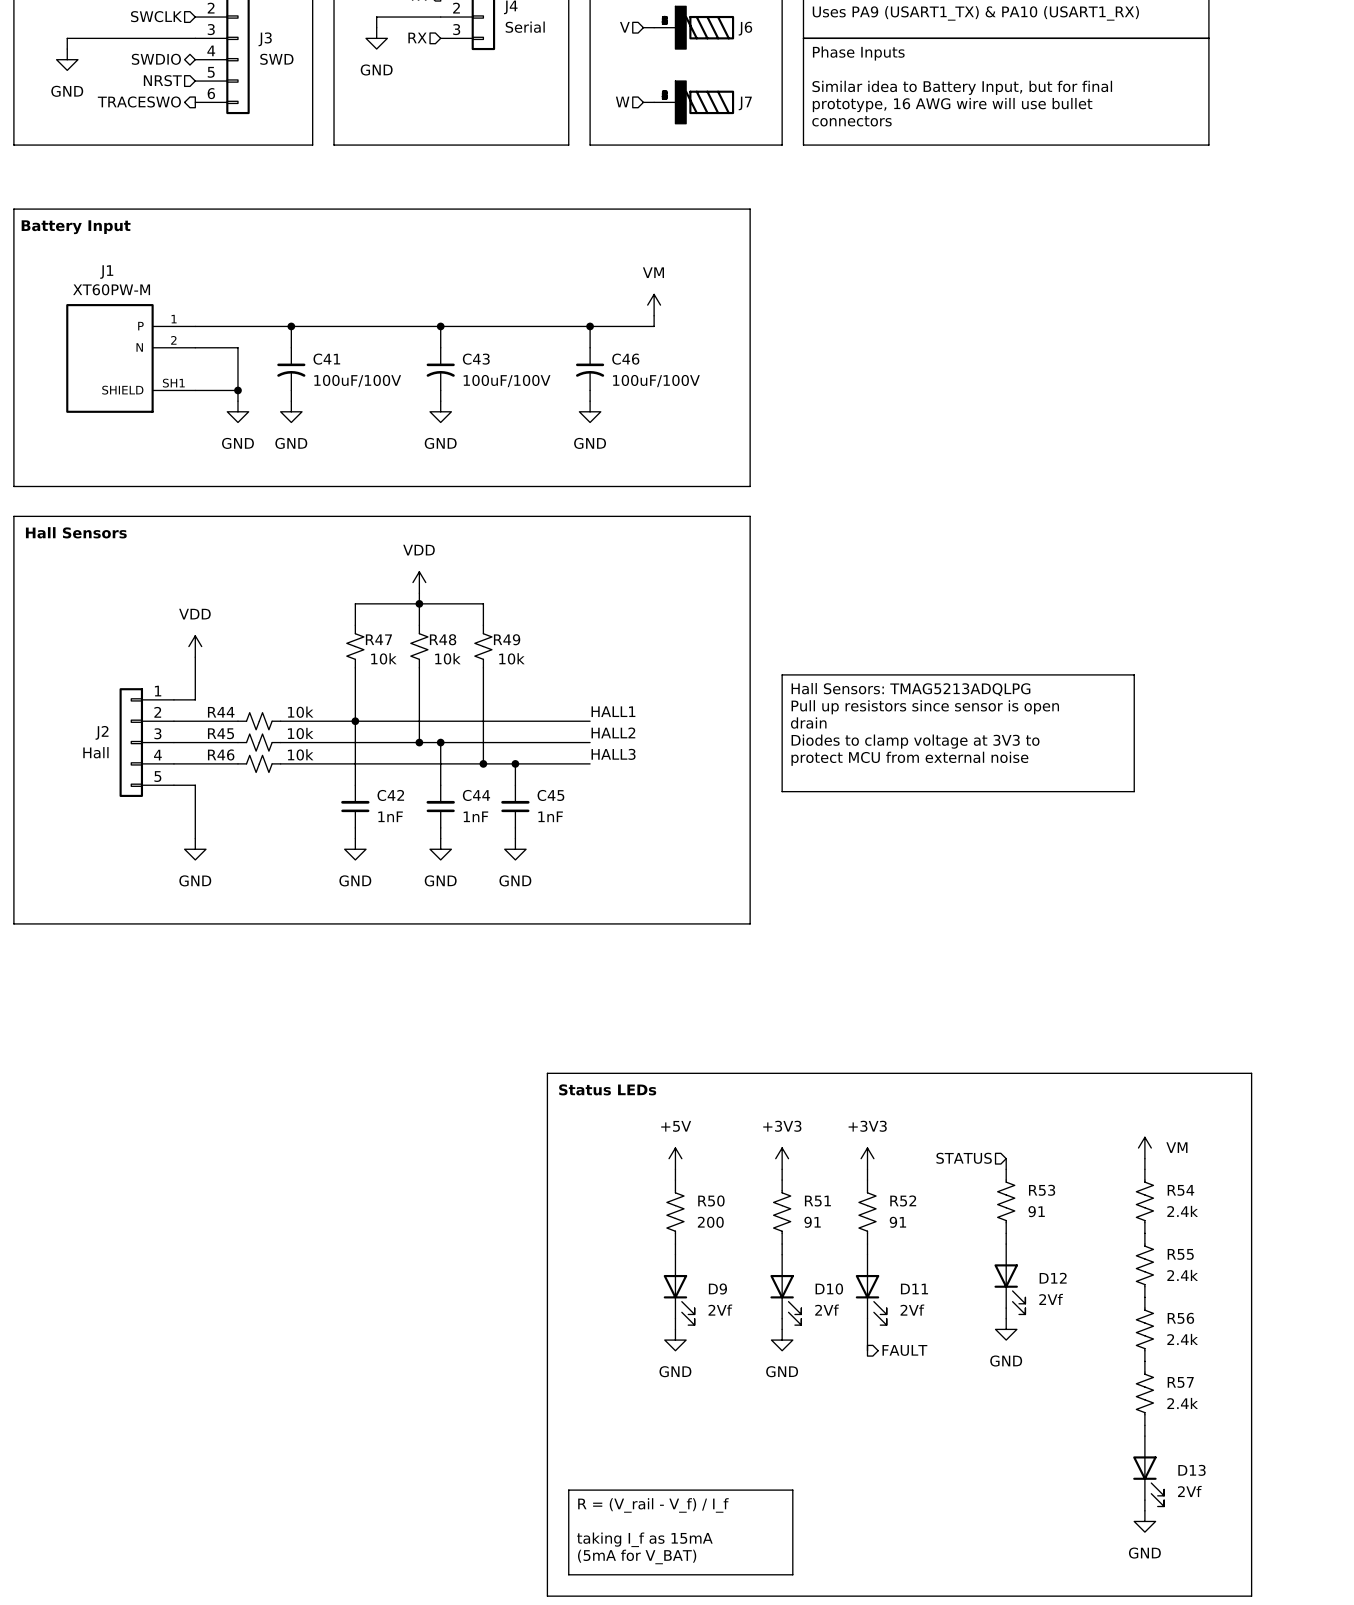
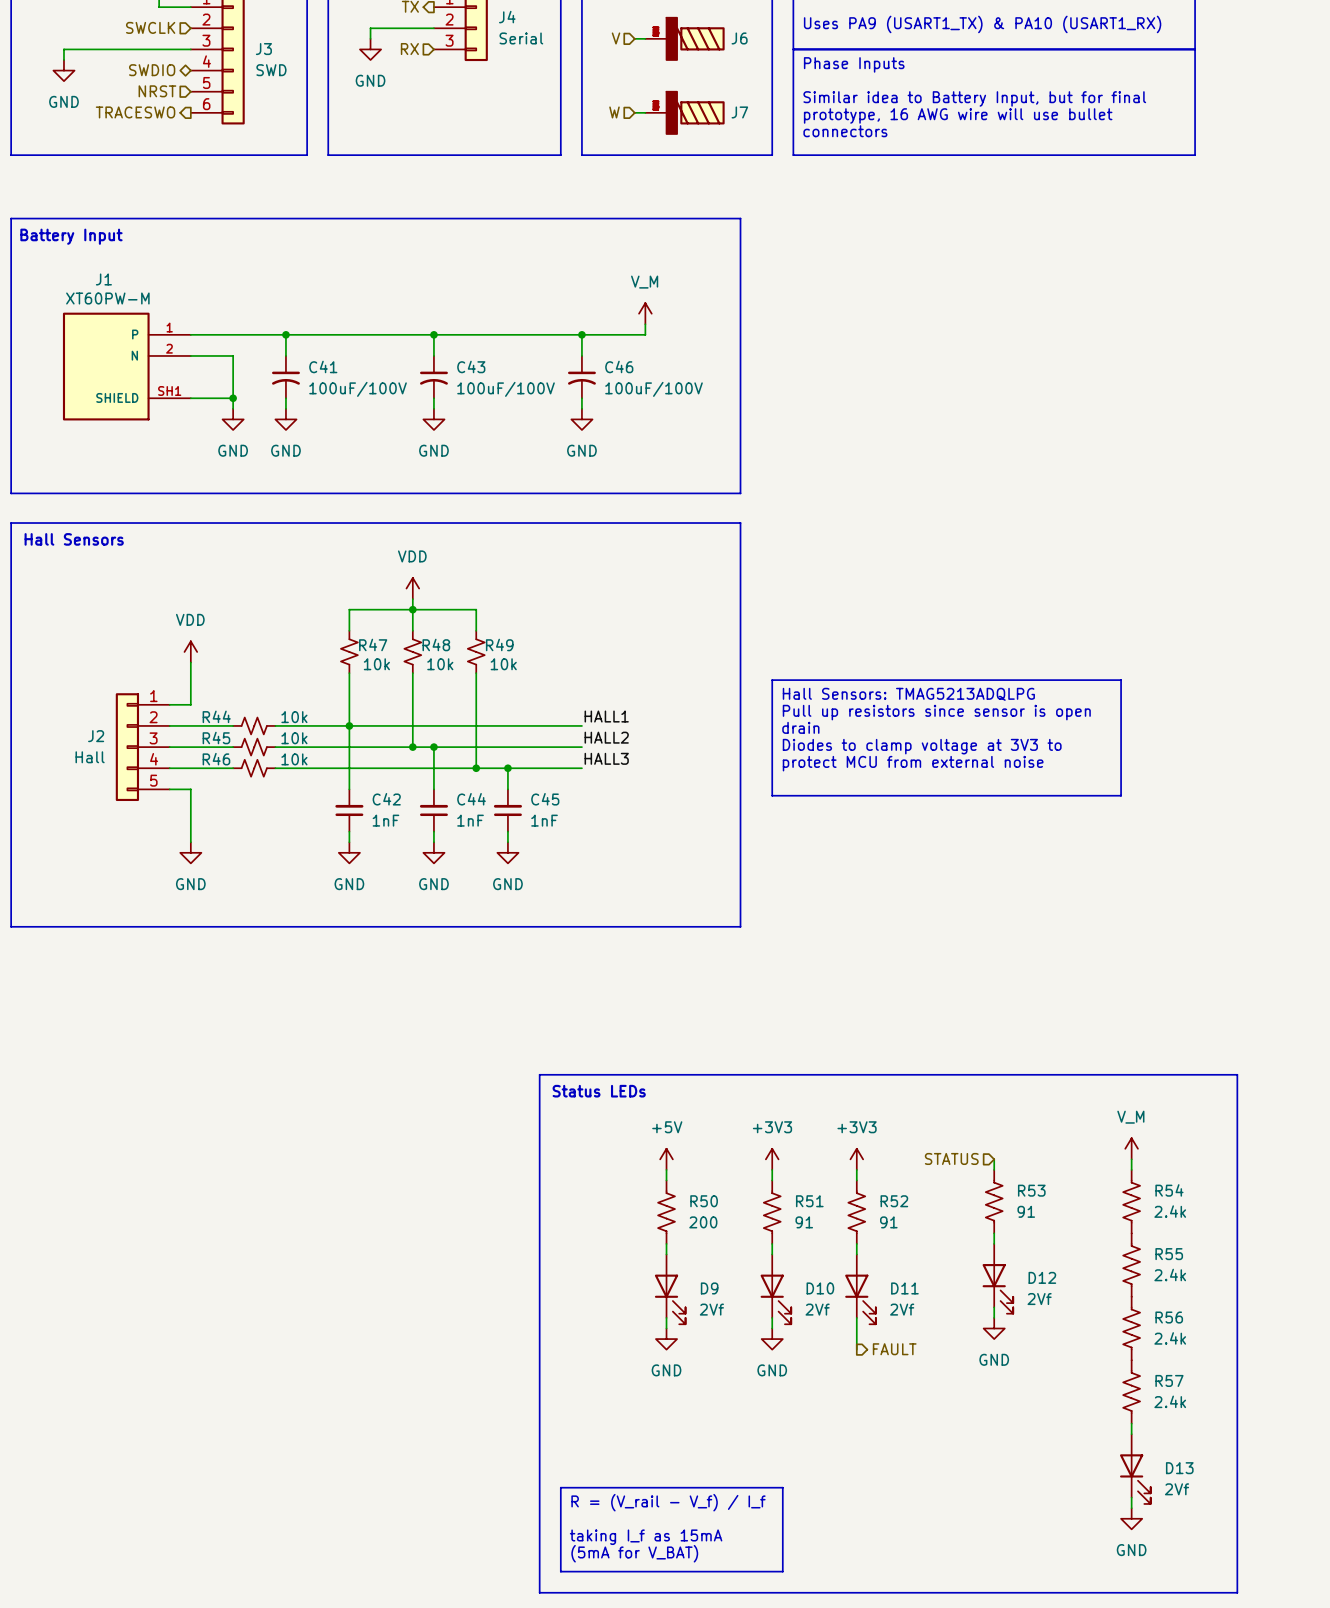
power symbol: VM (654, 305) -> V_M (645, 313)
power symbol: VM (1144, 1148) -> V_M (1131, 1148)

